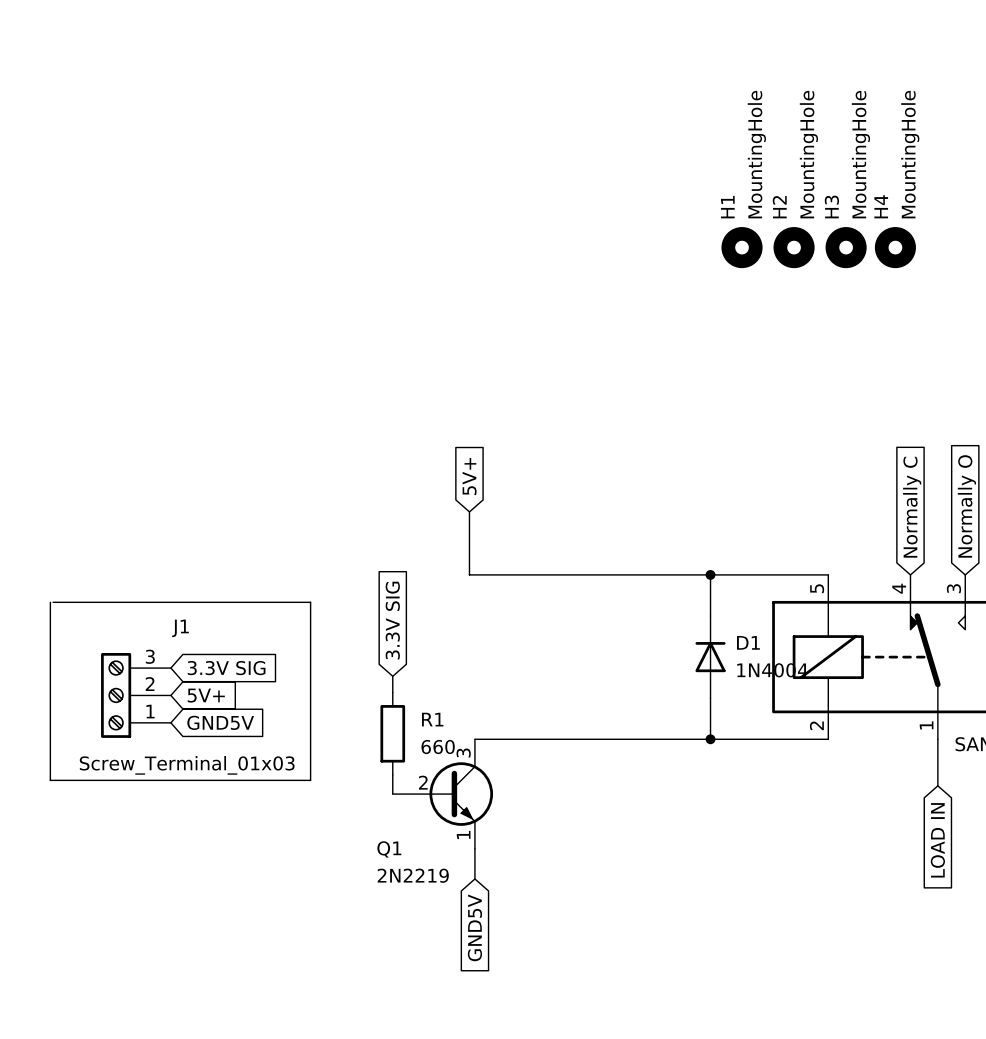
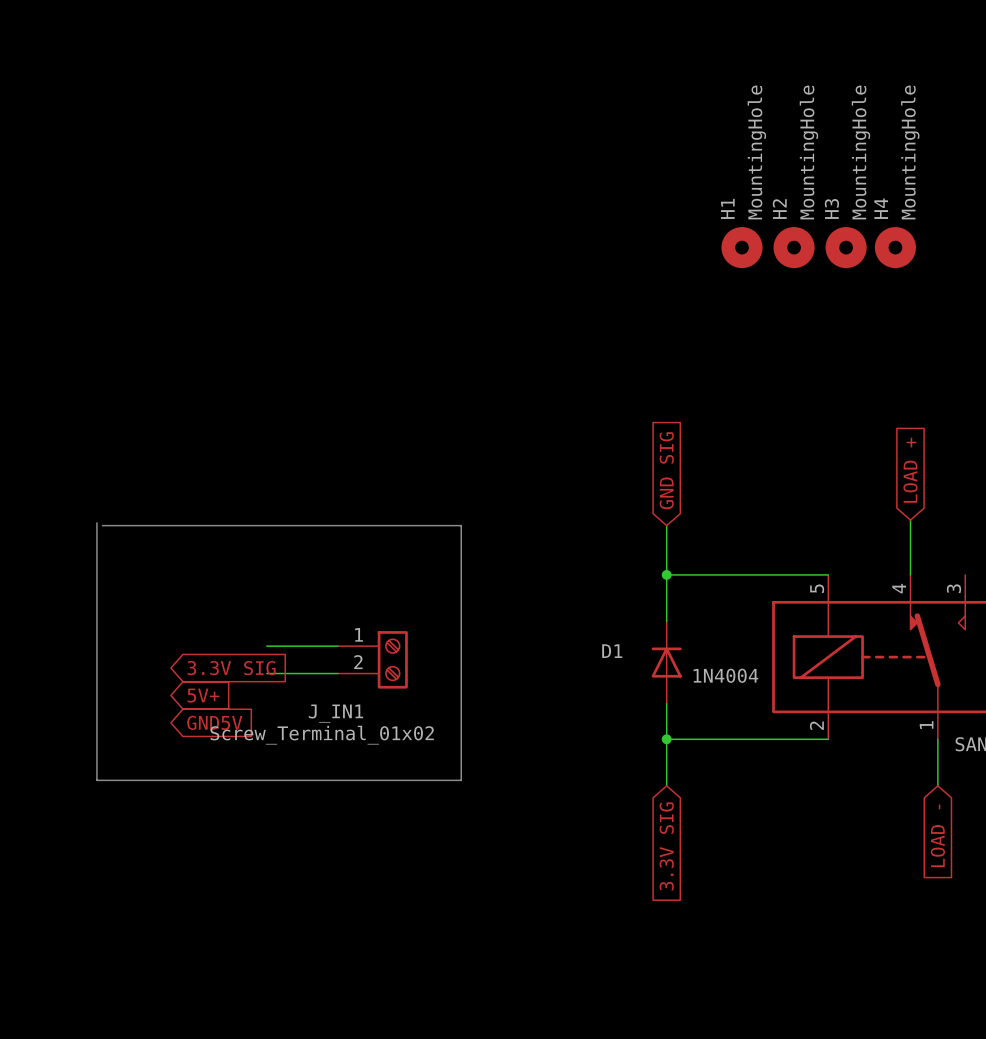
global label: none -> LOAD + (910, 470)
global label: none -> GND SIG (666, 470)
global label: 5V+ (469, 476) -> none
global label: Normally O (966, 506) -> none
global label: Normally C (912, 507) -> none
wire: (469, 511) (469, 574) (666, 574) -> none
wire: none -> (910, 520) (910, 574)
wire: none -> (666, 525) (666, 621)
wire: (710, 574) (710, 616) -> none
junction position: (710, 574) -> (666, 574)
line: (50, 602) (50, 780) (96, 780) -> (96, 522) (96, 780)
line: (53, 602) (310, 602) (310, 780) -> (102, 525) (461, 525) (461, 780) (310, 780)
global label: 3.3V SIG (392, 620) -> none
D1 name position: D1 (748, 642) -> D1 (612, 651)
wire: none -> (266, 646) (337, 646)
D1 position: (710, 657) -> (666, 662)
J_IN1: none -> Screw_Terminal_01x02 (372, 659)
wire: none -> (266, 673) (337, 673)
J1: Screw_Terminal_01x03 (135, 695) -> none
wire: (710, 698) (710, 739) -> none
wire: none -> (666, 703) (666, 785)
R1: 660 (392, 733) -> none
wire: (474, 739) (666, 739) -> none
junction position: (710, 739) -> (666, 739)
wire: (392, 774) (392, 794) -> none
Q1: 2N2219 (442, 794) -> none
global label: LOAD IN (937, 840) -> LOAD - (937, 835)
global label: none -> 3.3V SIG (666, 846)
wire: (474, 848) (474, 878) -> none
global label: GND5V (474, 927) -> none

